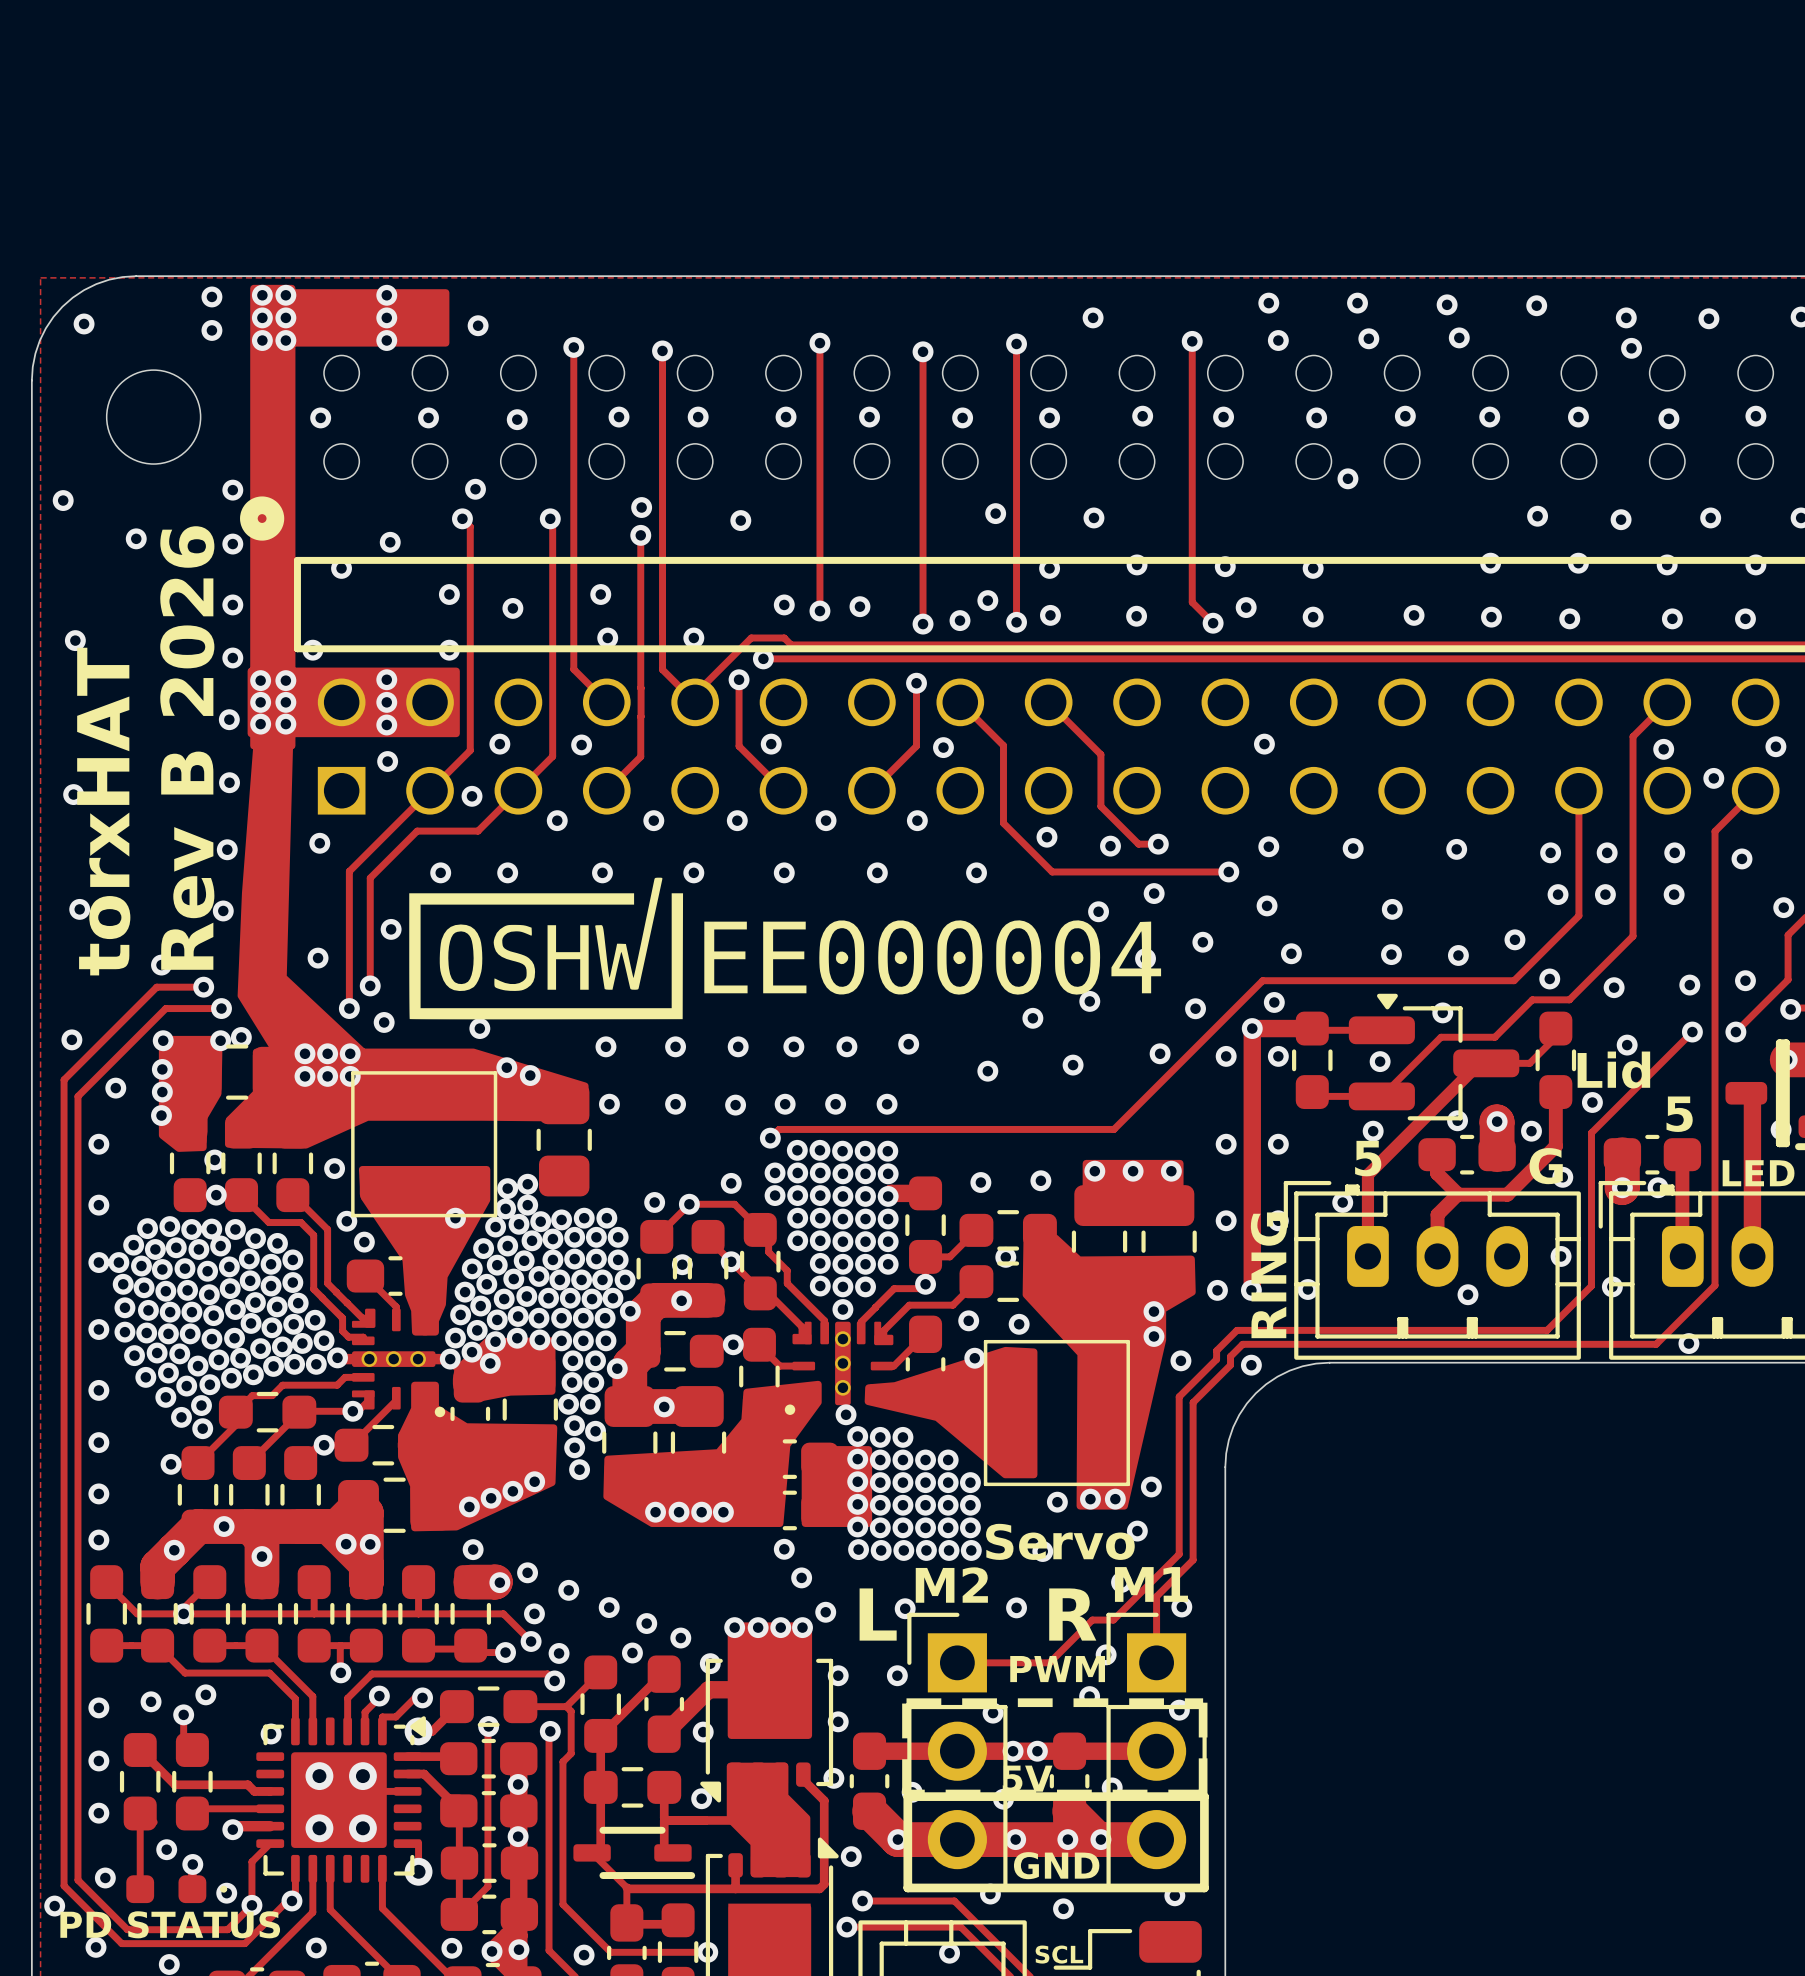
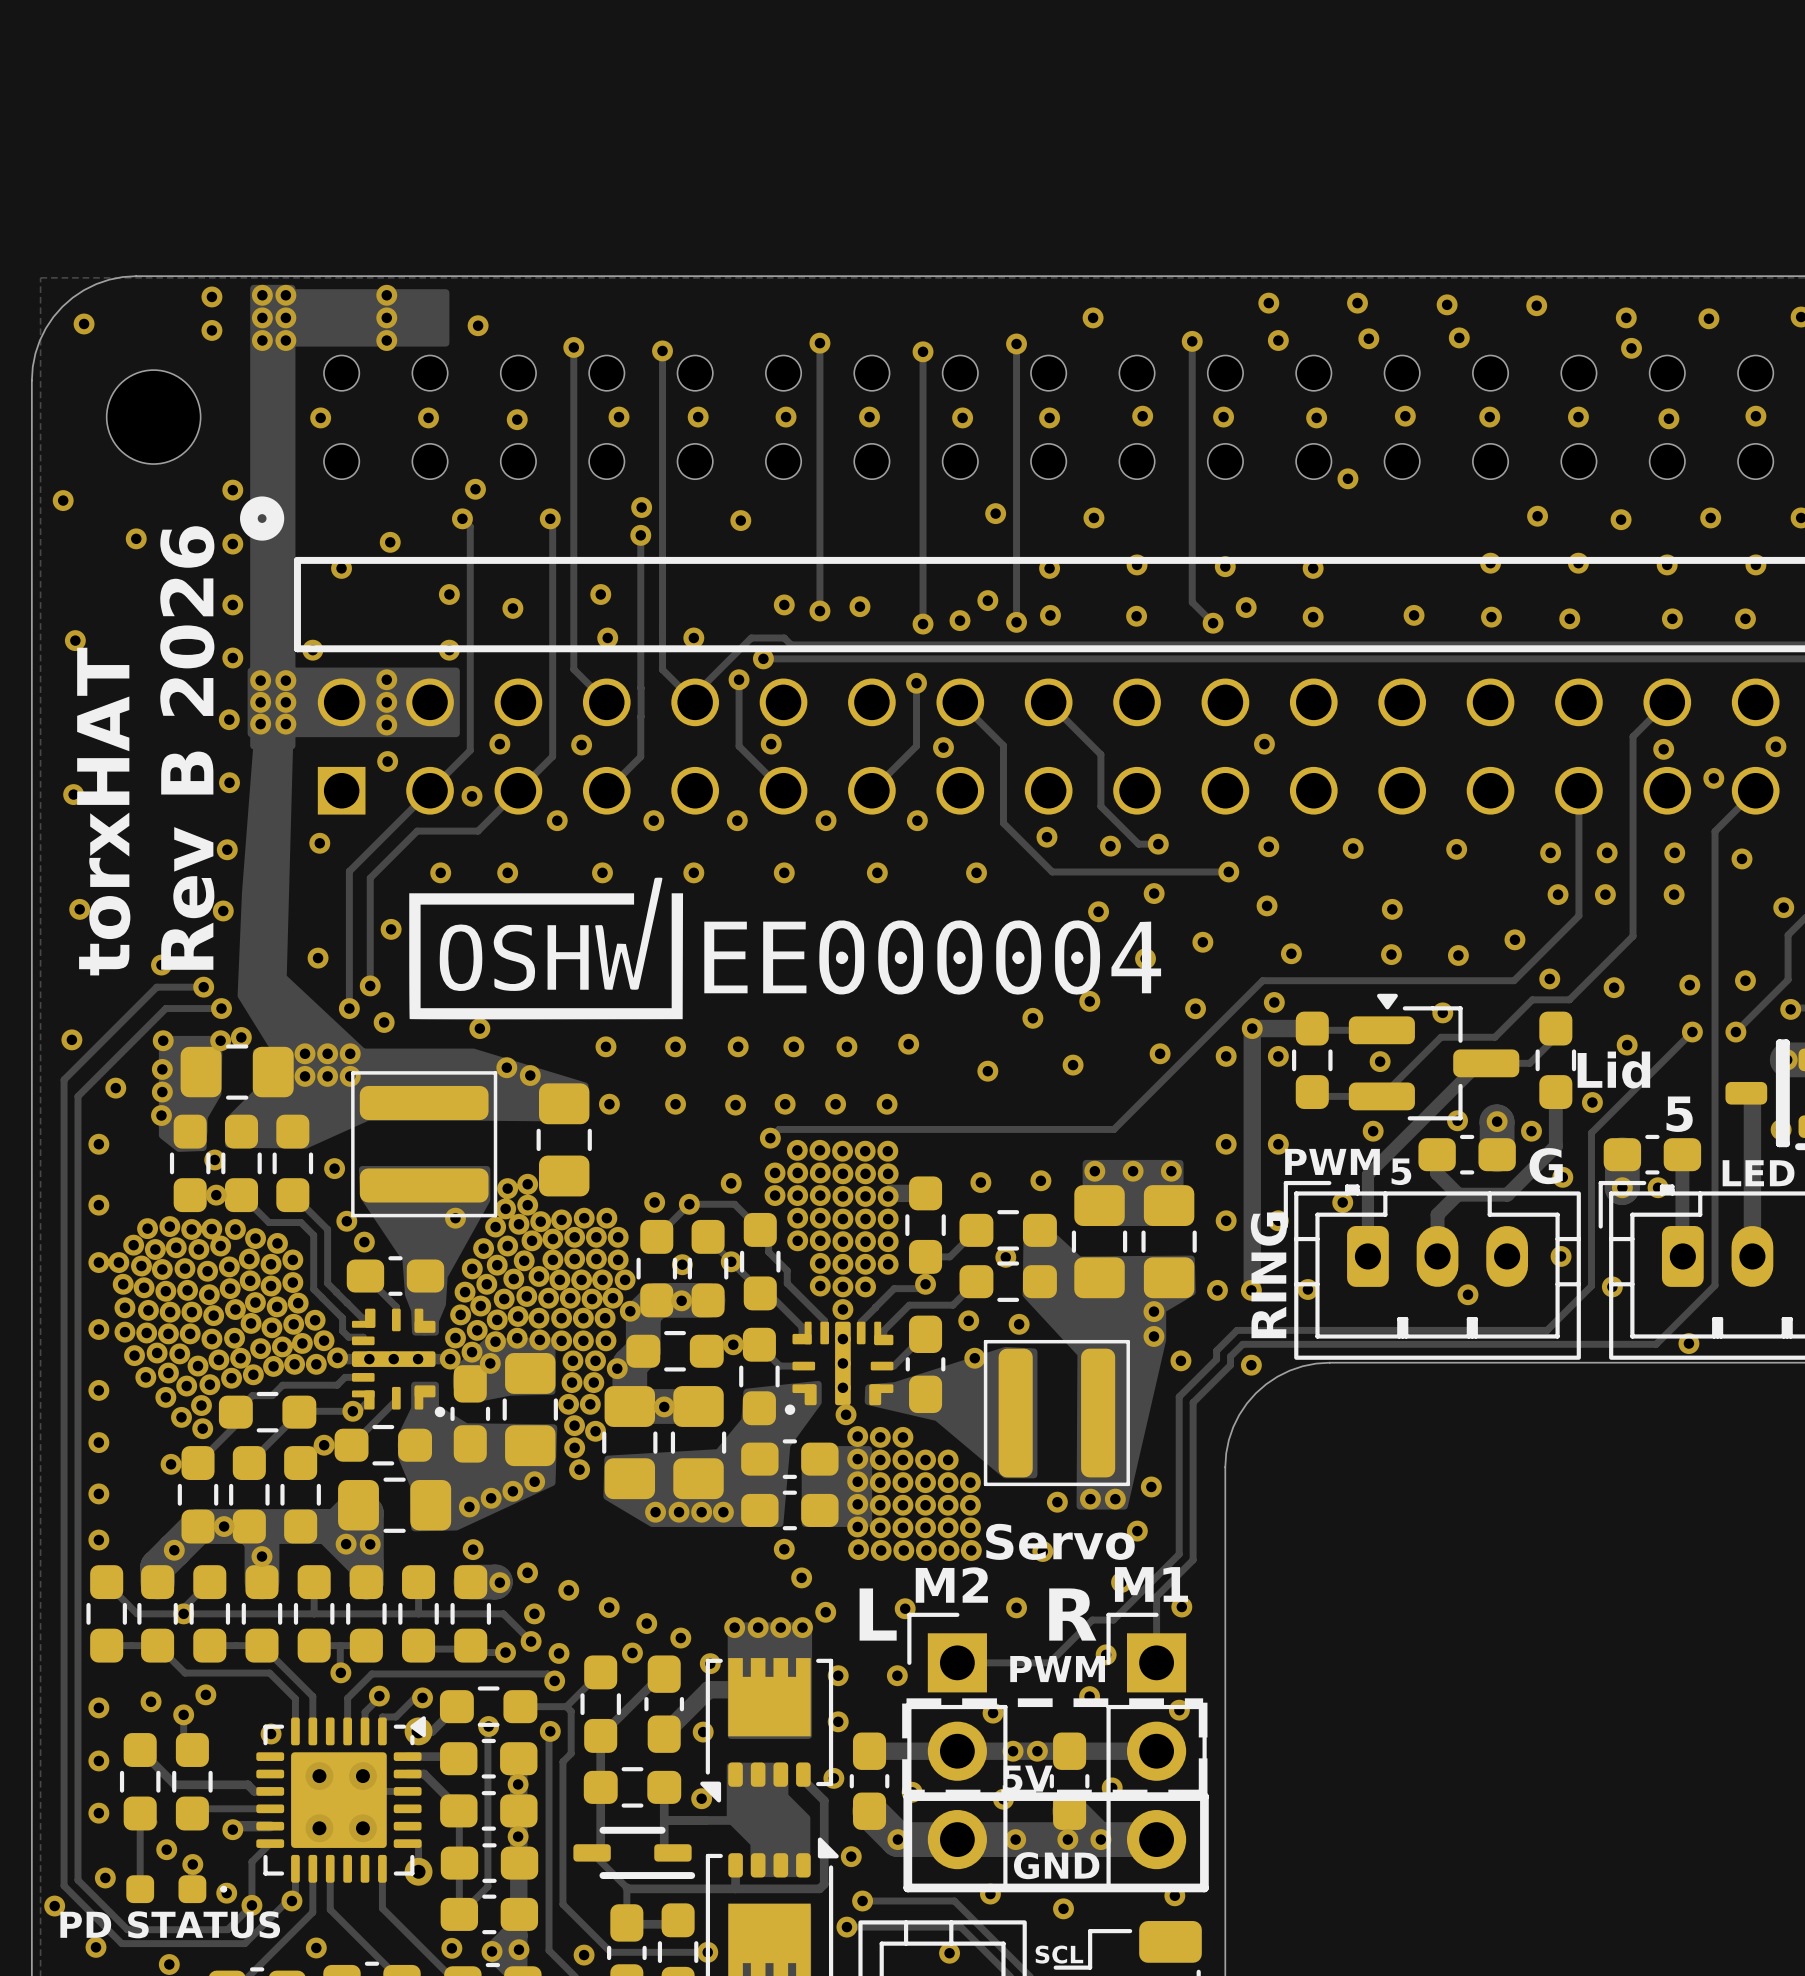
text position: 5 (1368, 1158) -> 5 (1401, 1171)
text: none -> PWM (1332, 1161)

